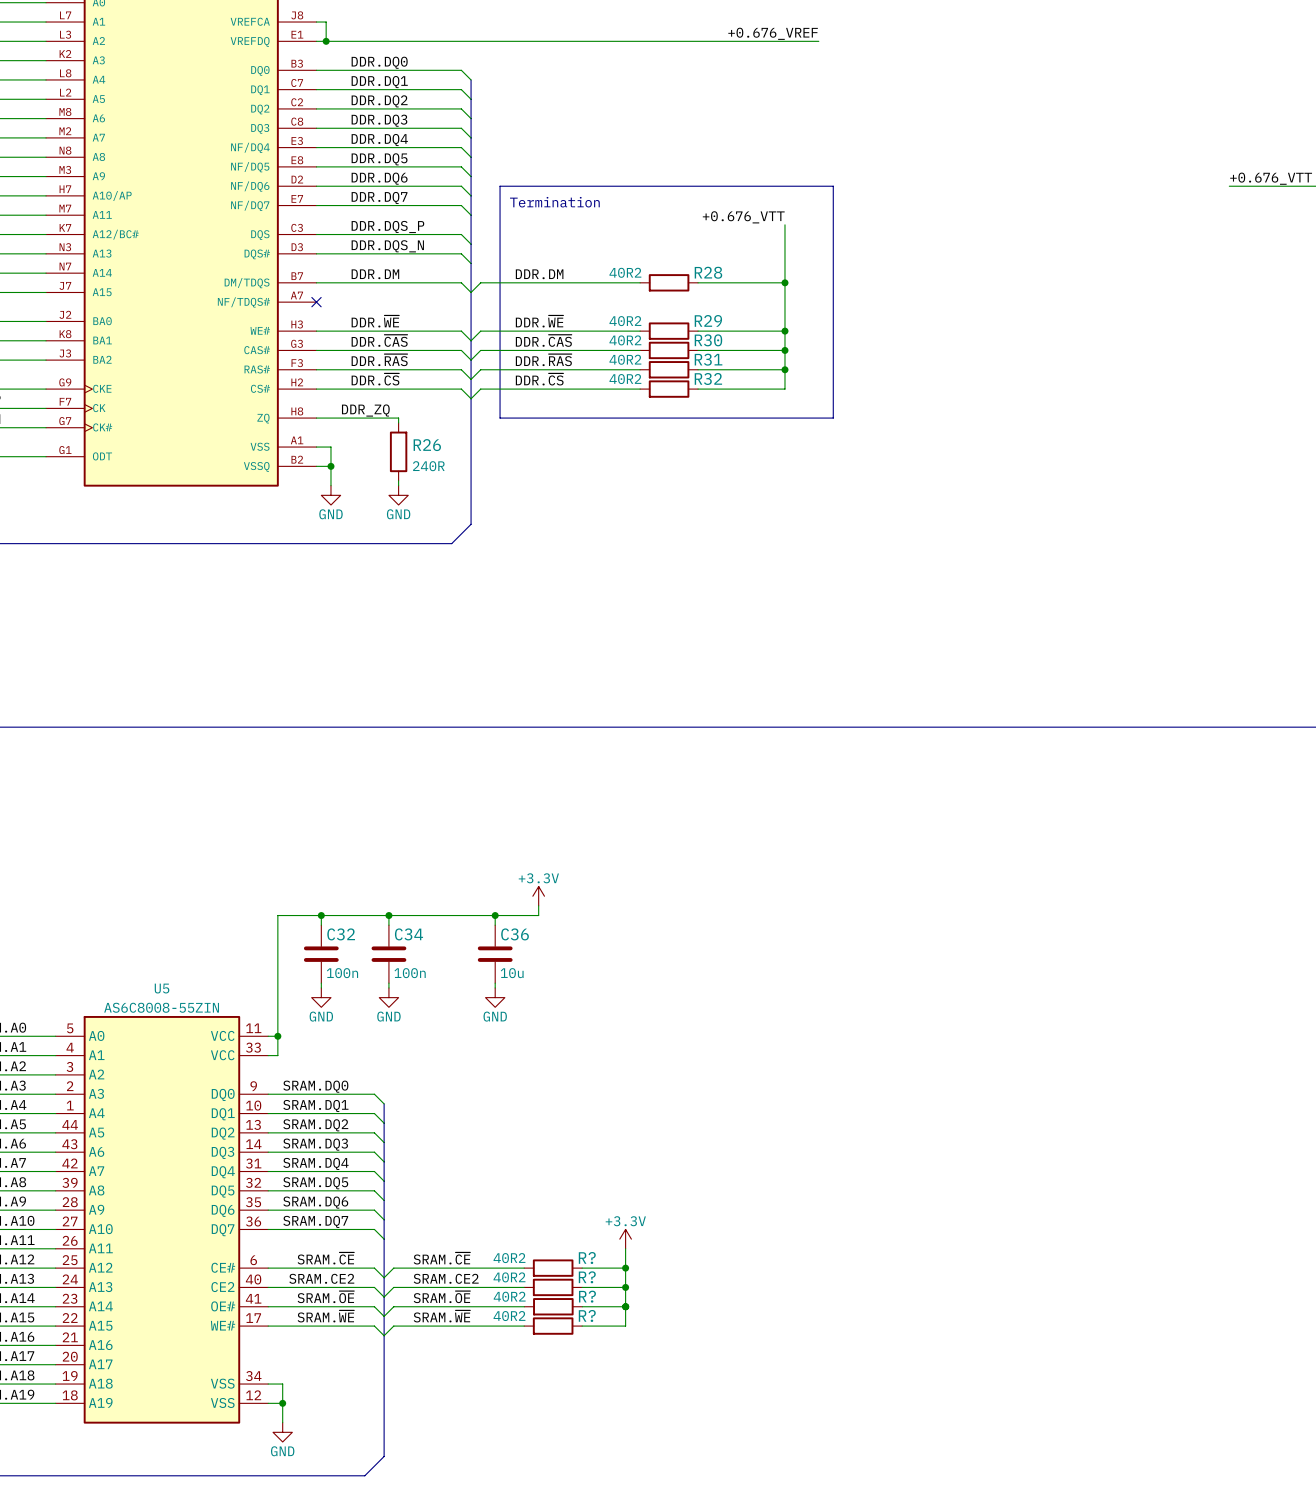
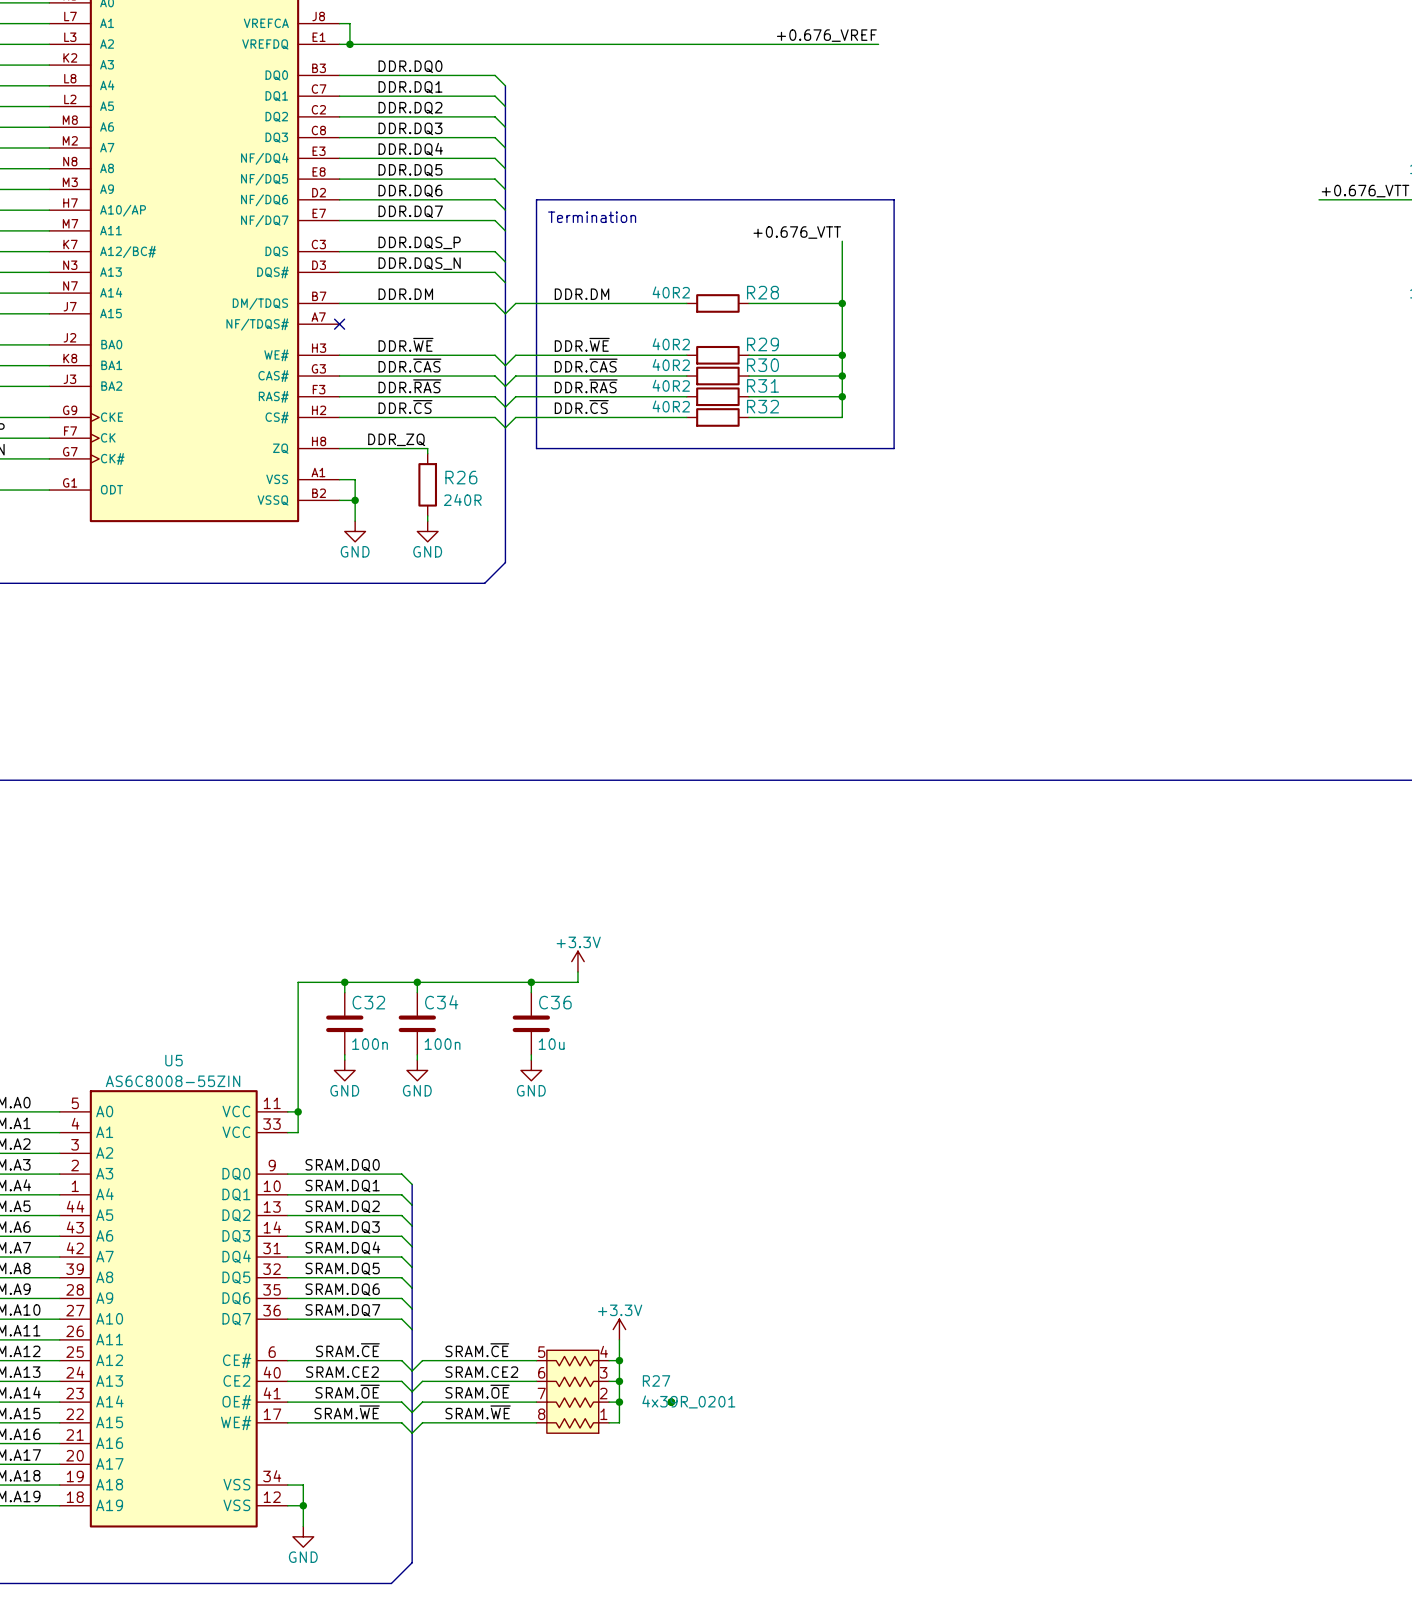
power symbol position: +3.3V (625, 1239) -> +3.3V (619, 1329)
wire: none -> (619, 1339) (619, 1422) (609, 1422)
wire: (625, 1248) (625, 1326) (582, 1326) -> none
R?: (553, 1268) -> none
junction: none -> (619, 1360)
wire: (582, 1268) (625, 1268) -> none
junction: (625, 1268) -> none
R?: (553, 1287) -> none
junction: none -> (619, 1381)
wire: (582, 1287) (625, 1287) -> none
junction: (625, 1287) -> none
R27: none -> (572, 1391)
R?: (553, 1306) -> none
junction: none -> (619, 1402)
wire: (582, 1306) (625, 1306) -> none
R?: (553, 1326) -> none

